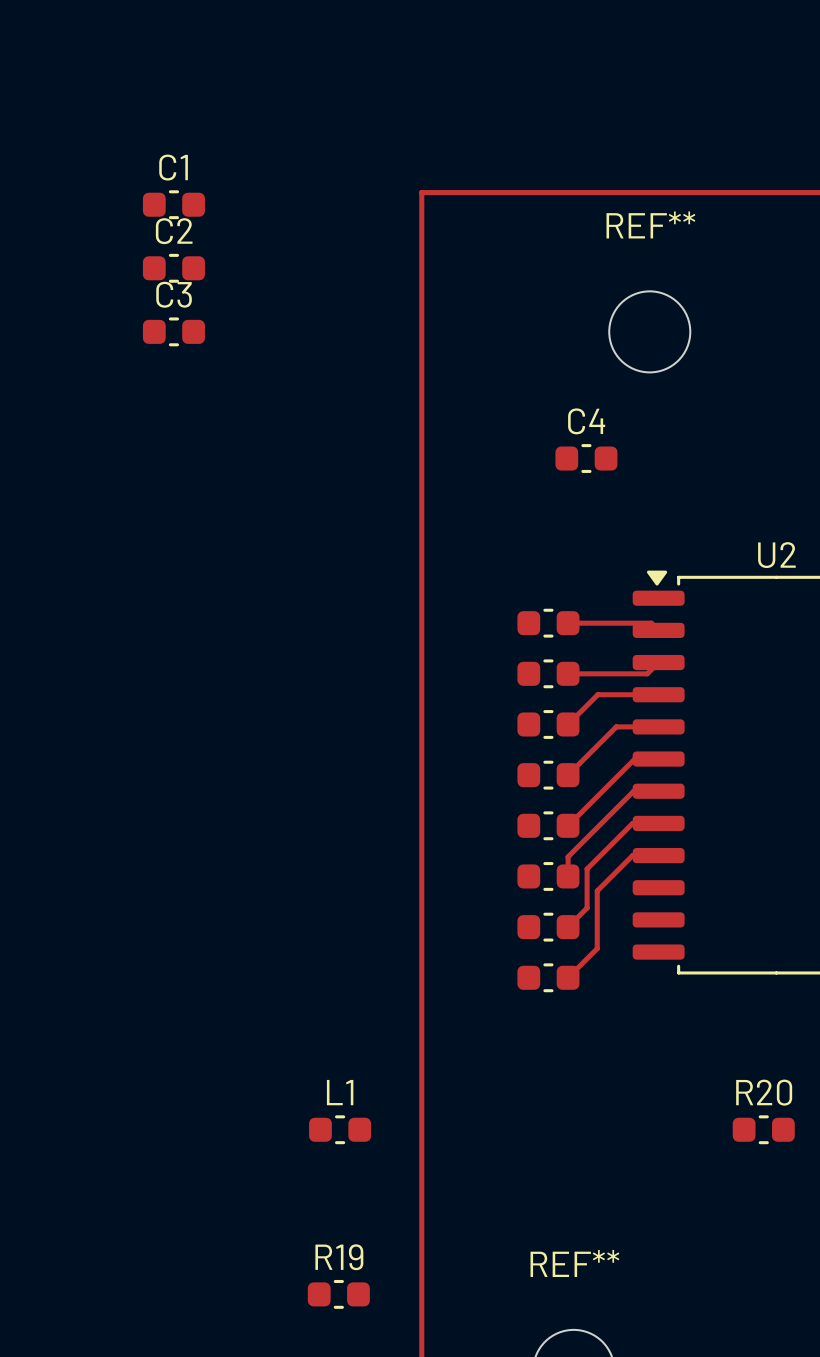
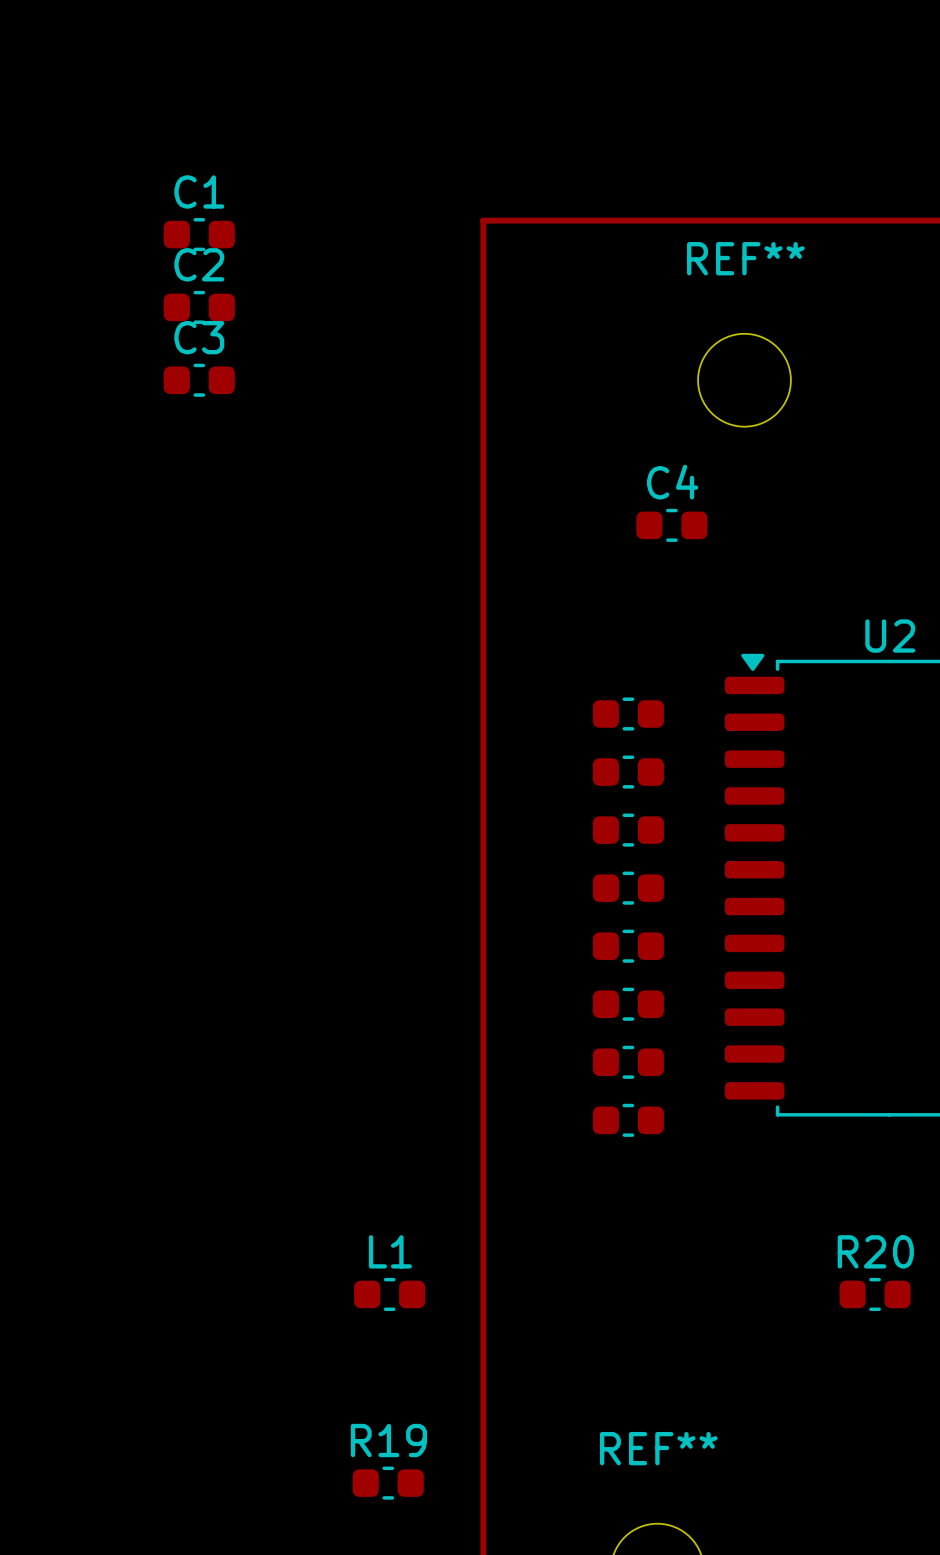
track: (568, 623) (651, 623) (658, 630) -> none
track: (658, 662) (647, 673) (568, 673) -> none
track: (658, 694) (597, 694) (568, 724) -> none
track: (658, 726) (616, 726) (568, 775) -> none
track: (658, 759) (634, 759) (568, 825) -> none
track: (658, 791) (633, 791) (568, 856) (568, 876) -> none
track: (658, 823) (632, 823) (587, 868) (587, 908) (568, 927) -> none
track: (658, 855) (632, 855) (597, 890) (597, 948) (568, 977) -> none

